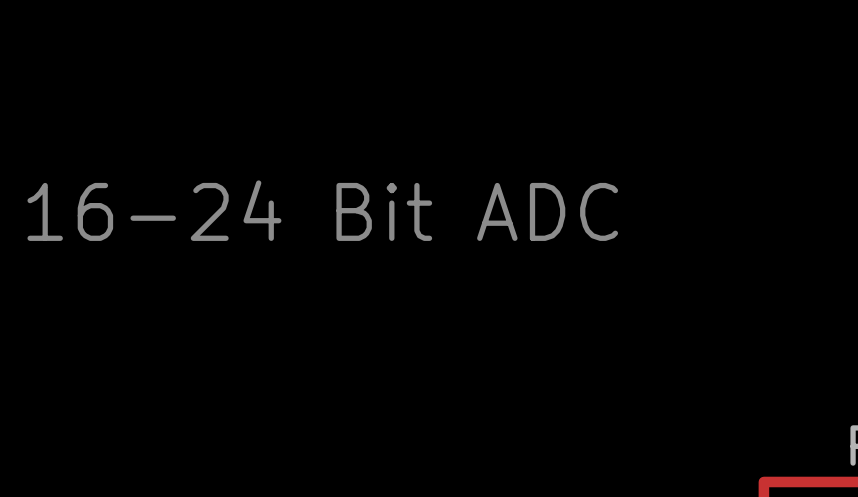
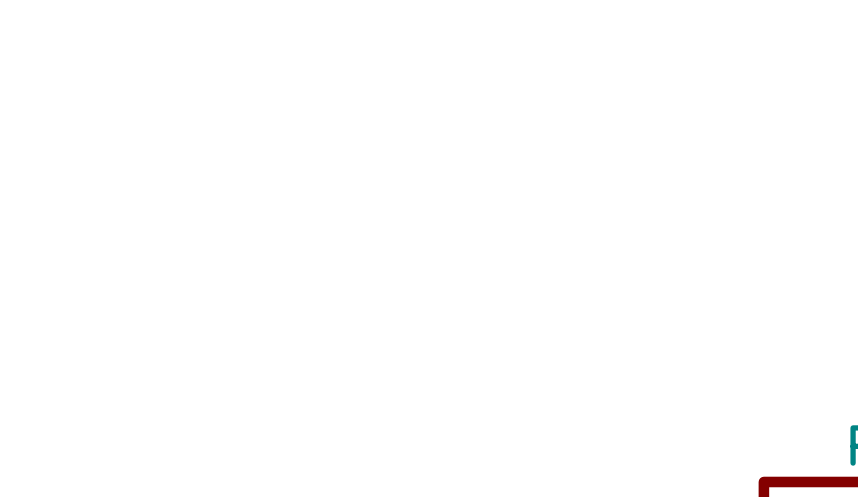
text: 16-24 Bit ADC (322, 210) -> none

